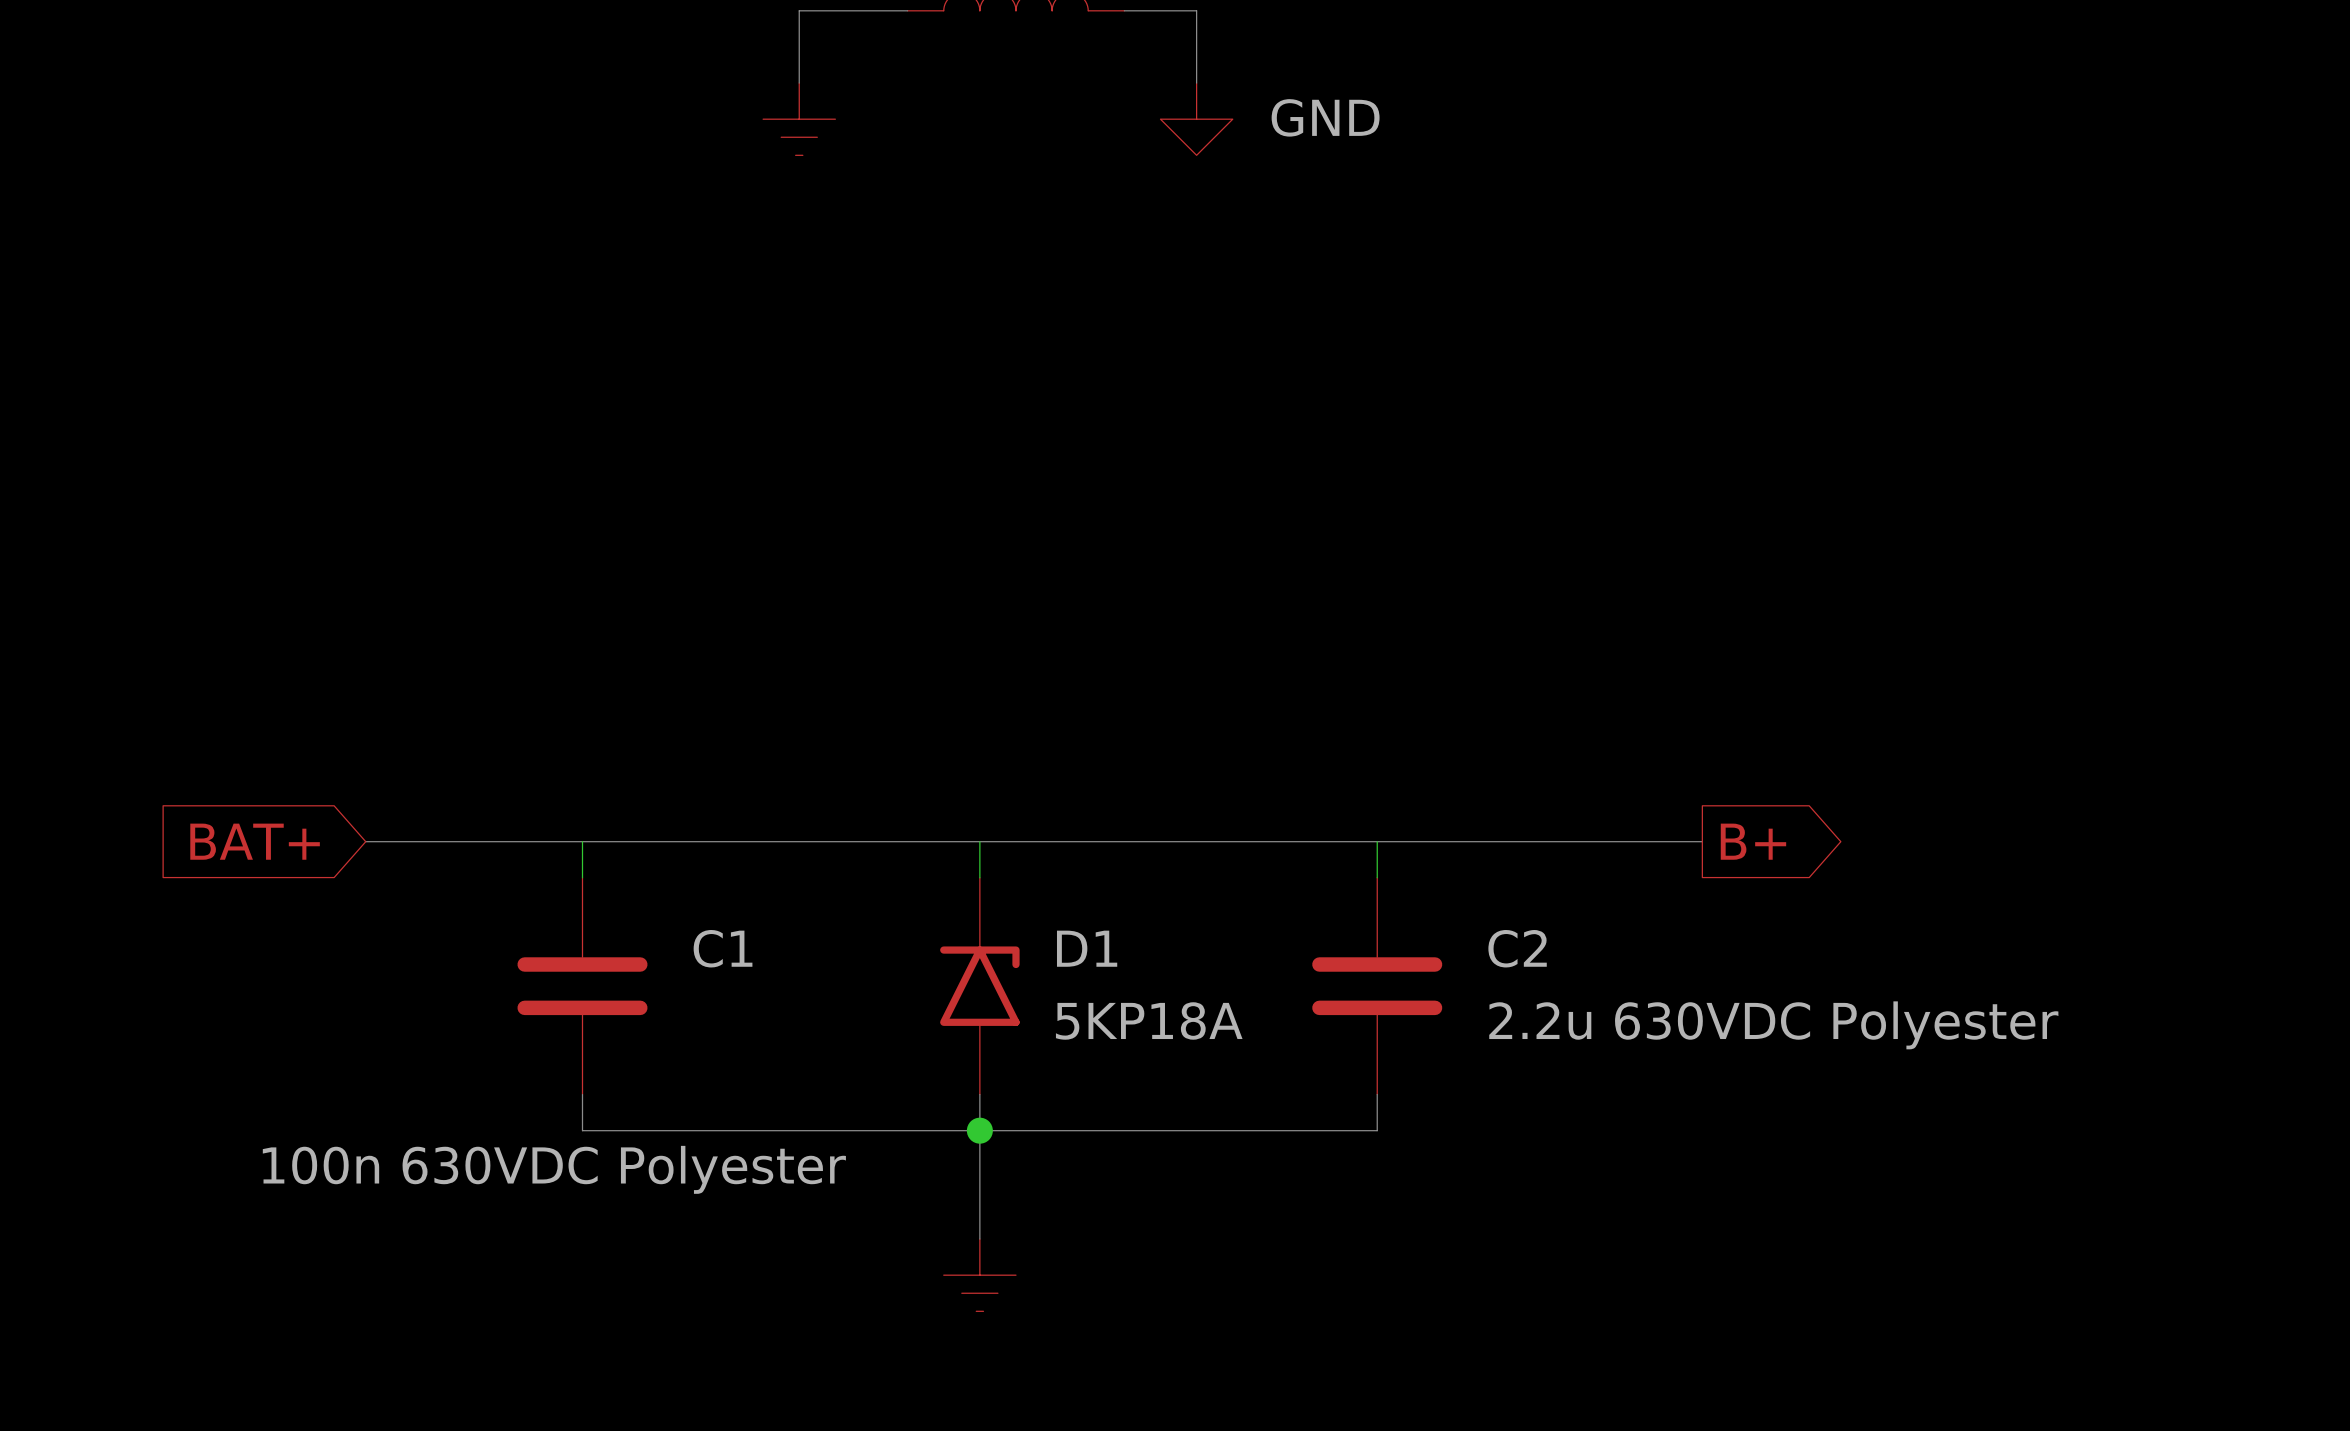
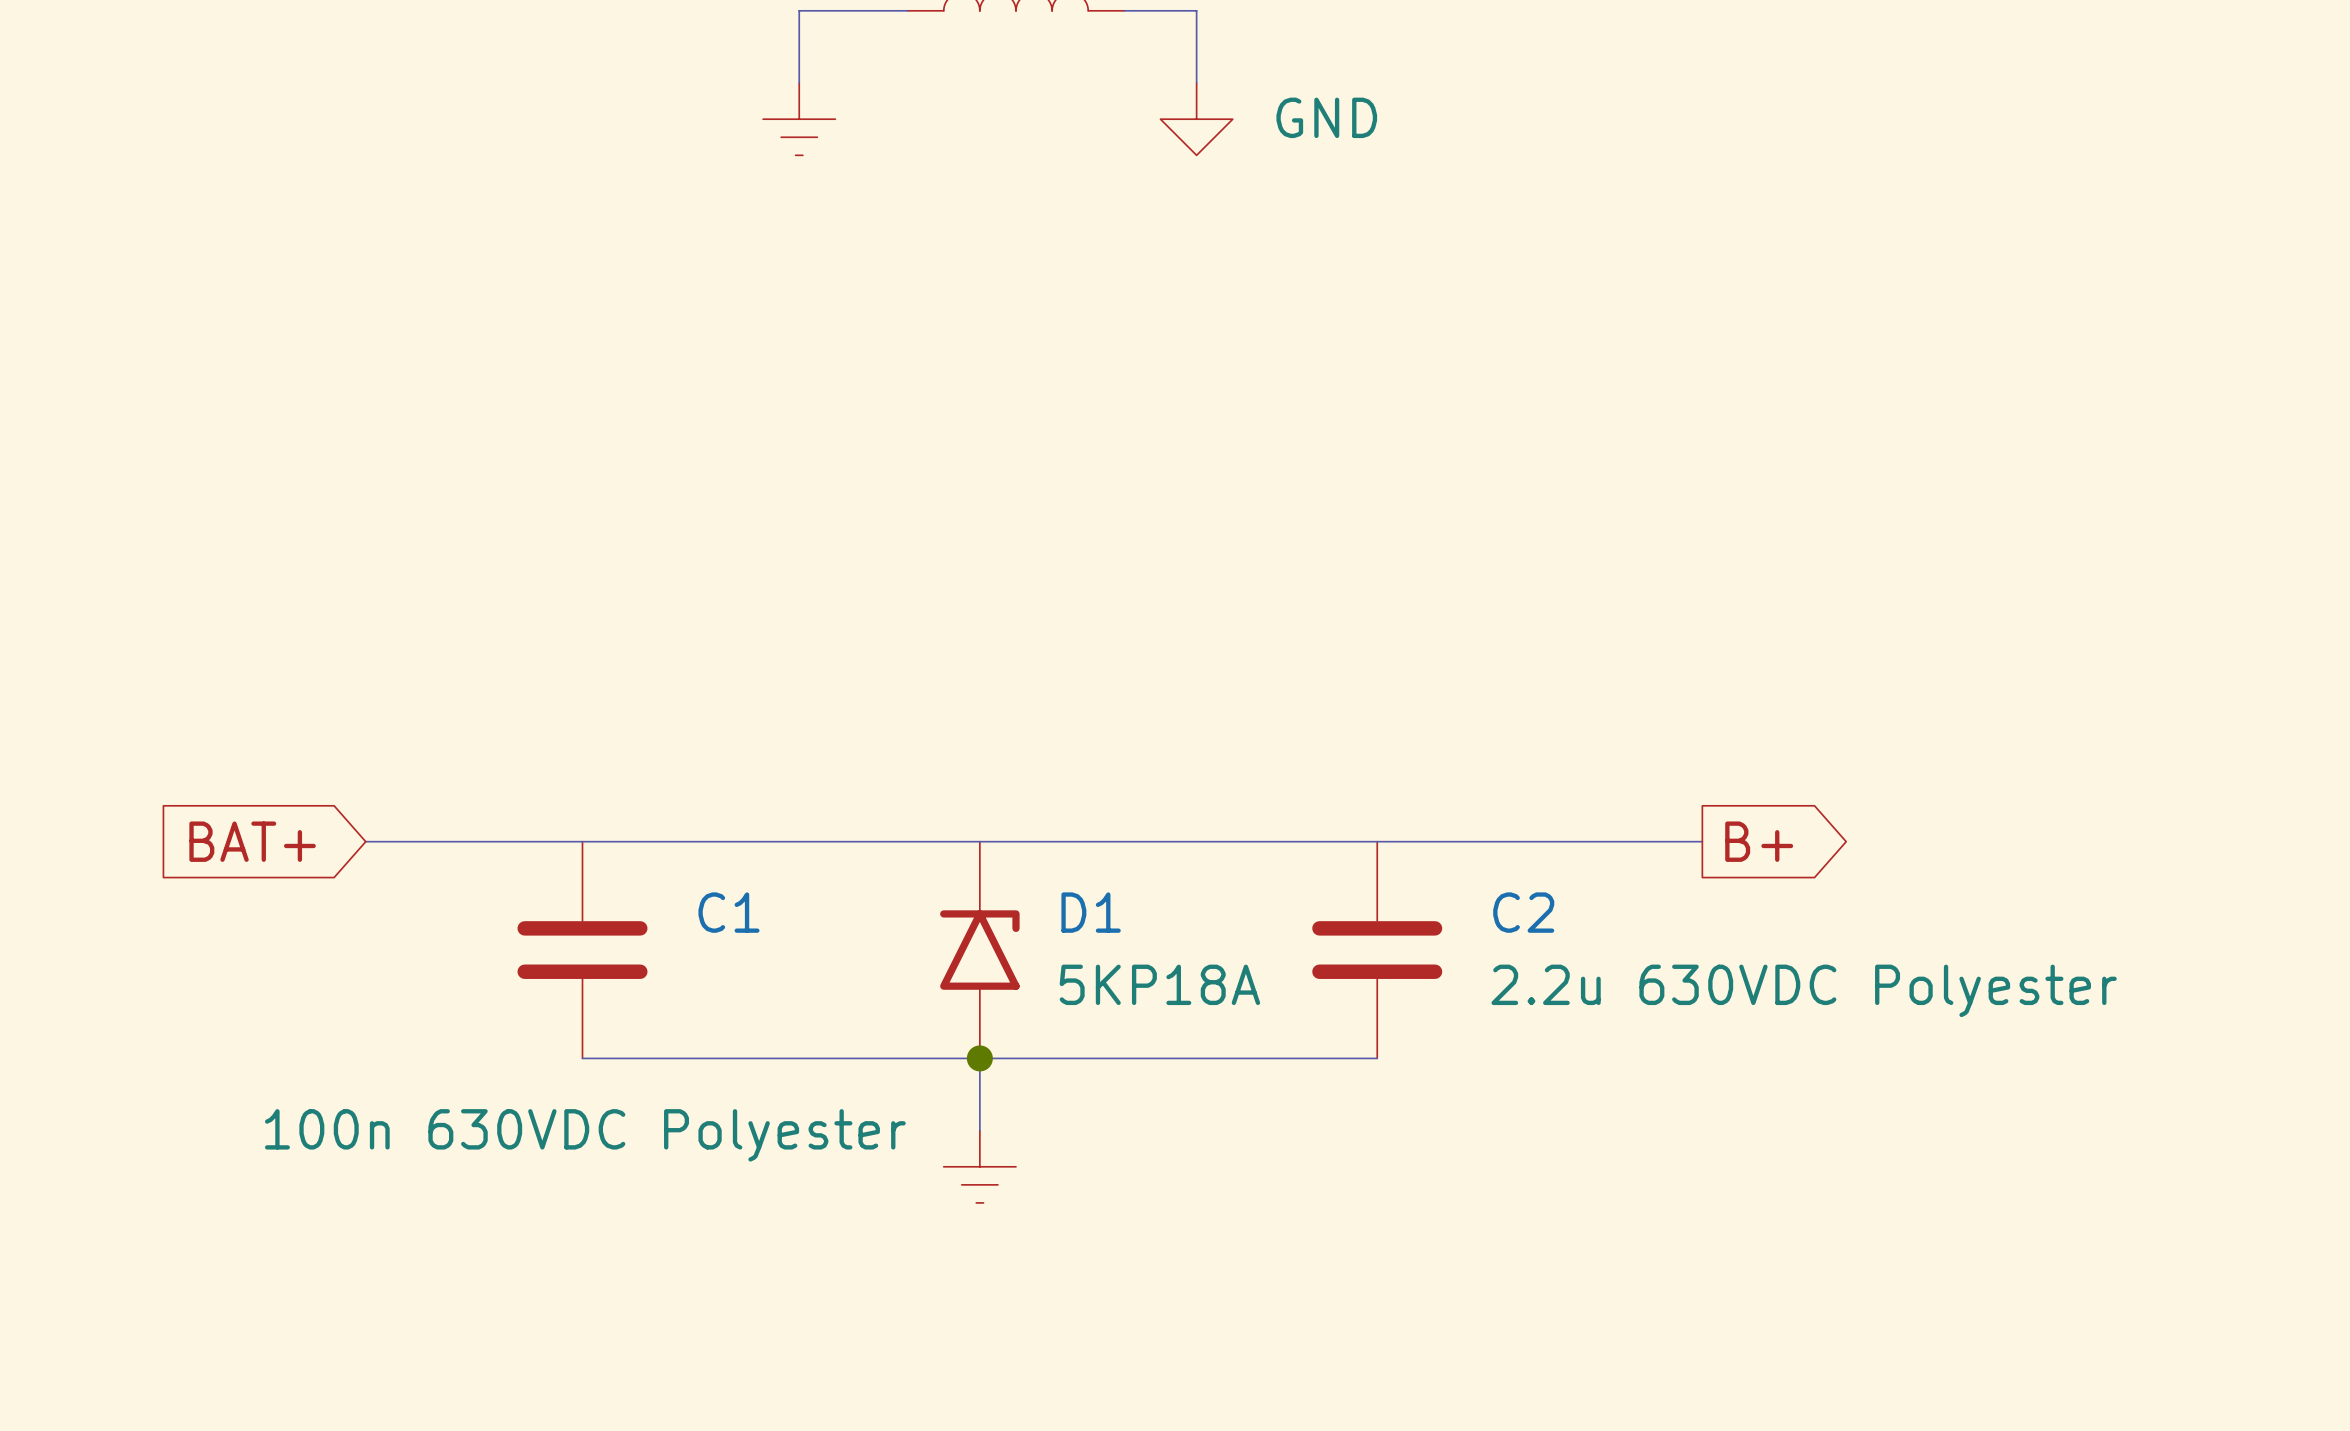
C1 position: (582, 986) -> (582, 950)
D1 position: (979, 986) -> (979, 950)
C2 position: (1377, 986) -> (1377, 950)
bus: none -> (582, 1058) (1377, 1058)
bus: none -> (979, 1058) (979, 1094)
bus: (582, 1094) (582, 1130) (1377, 1130) (1377, 1094) -> none
bus: (979, 1130) (979, 1239) -> none
junction position: (979, 1130) -> (979, 1058)
power symbol position: (979, 1275) -> (979, 1166)

